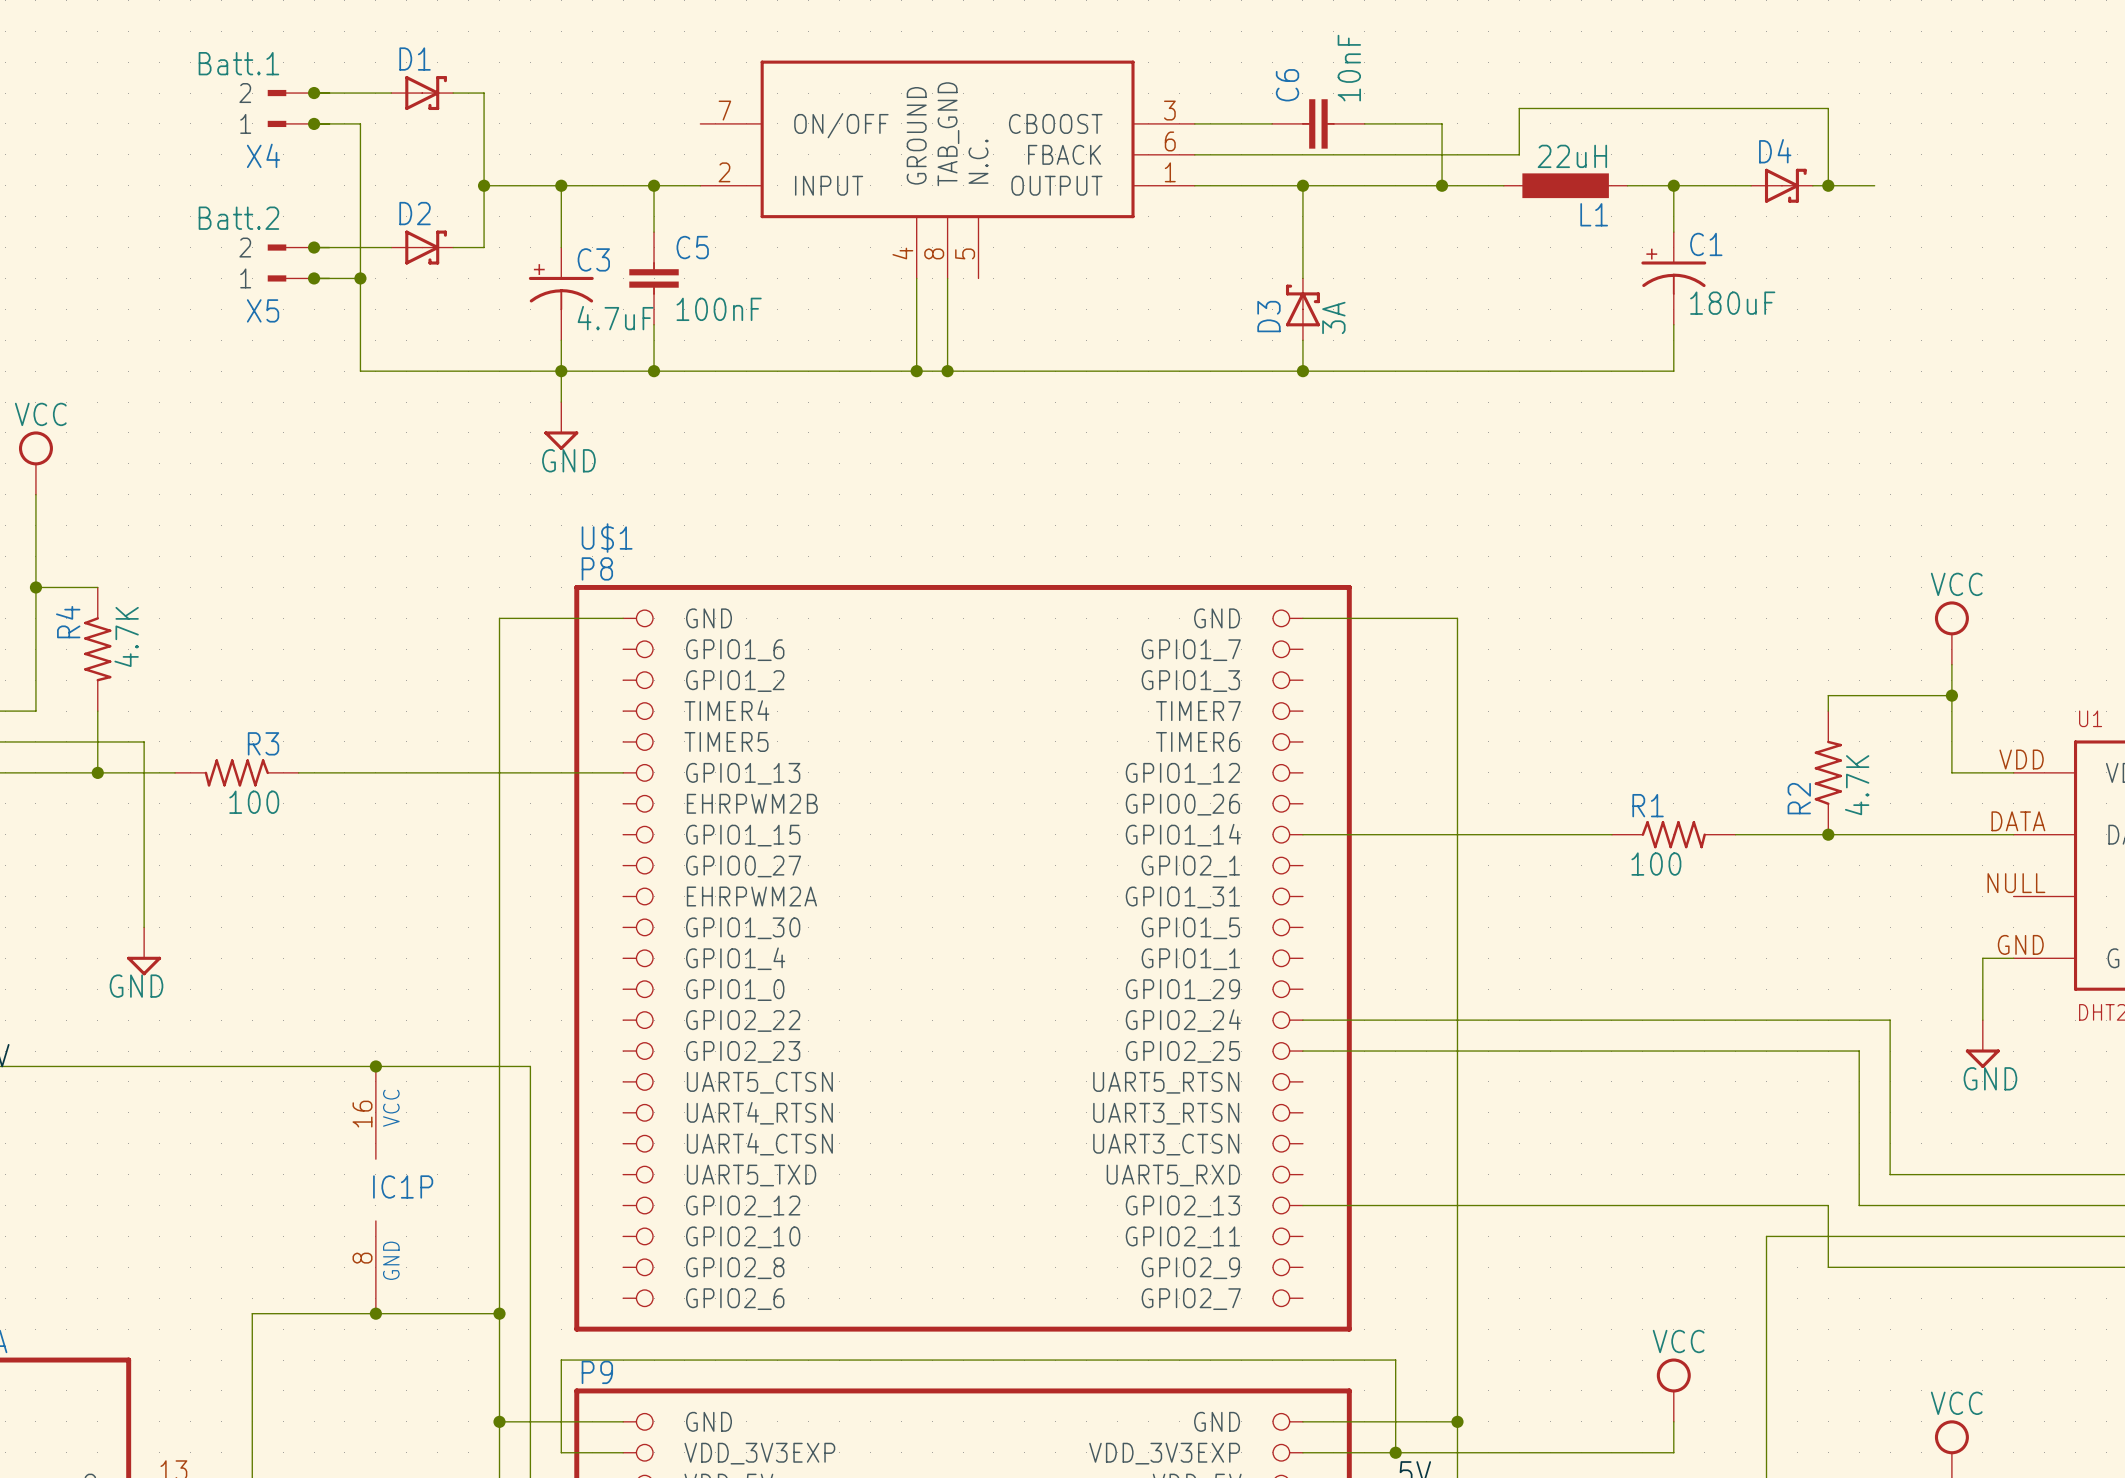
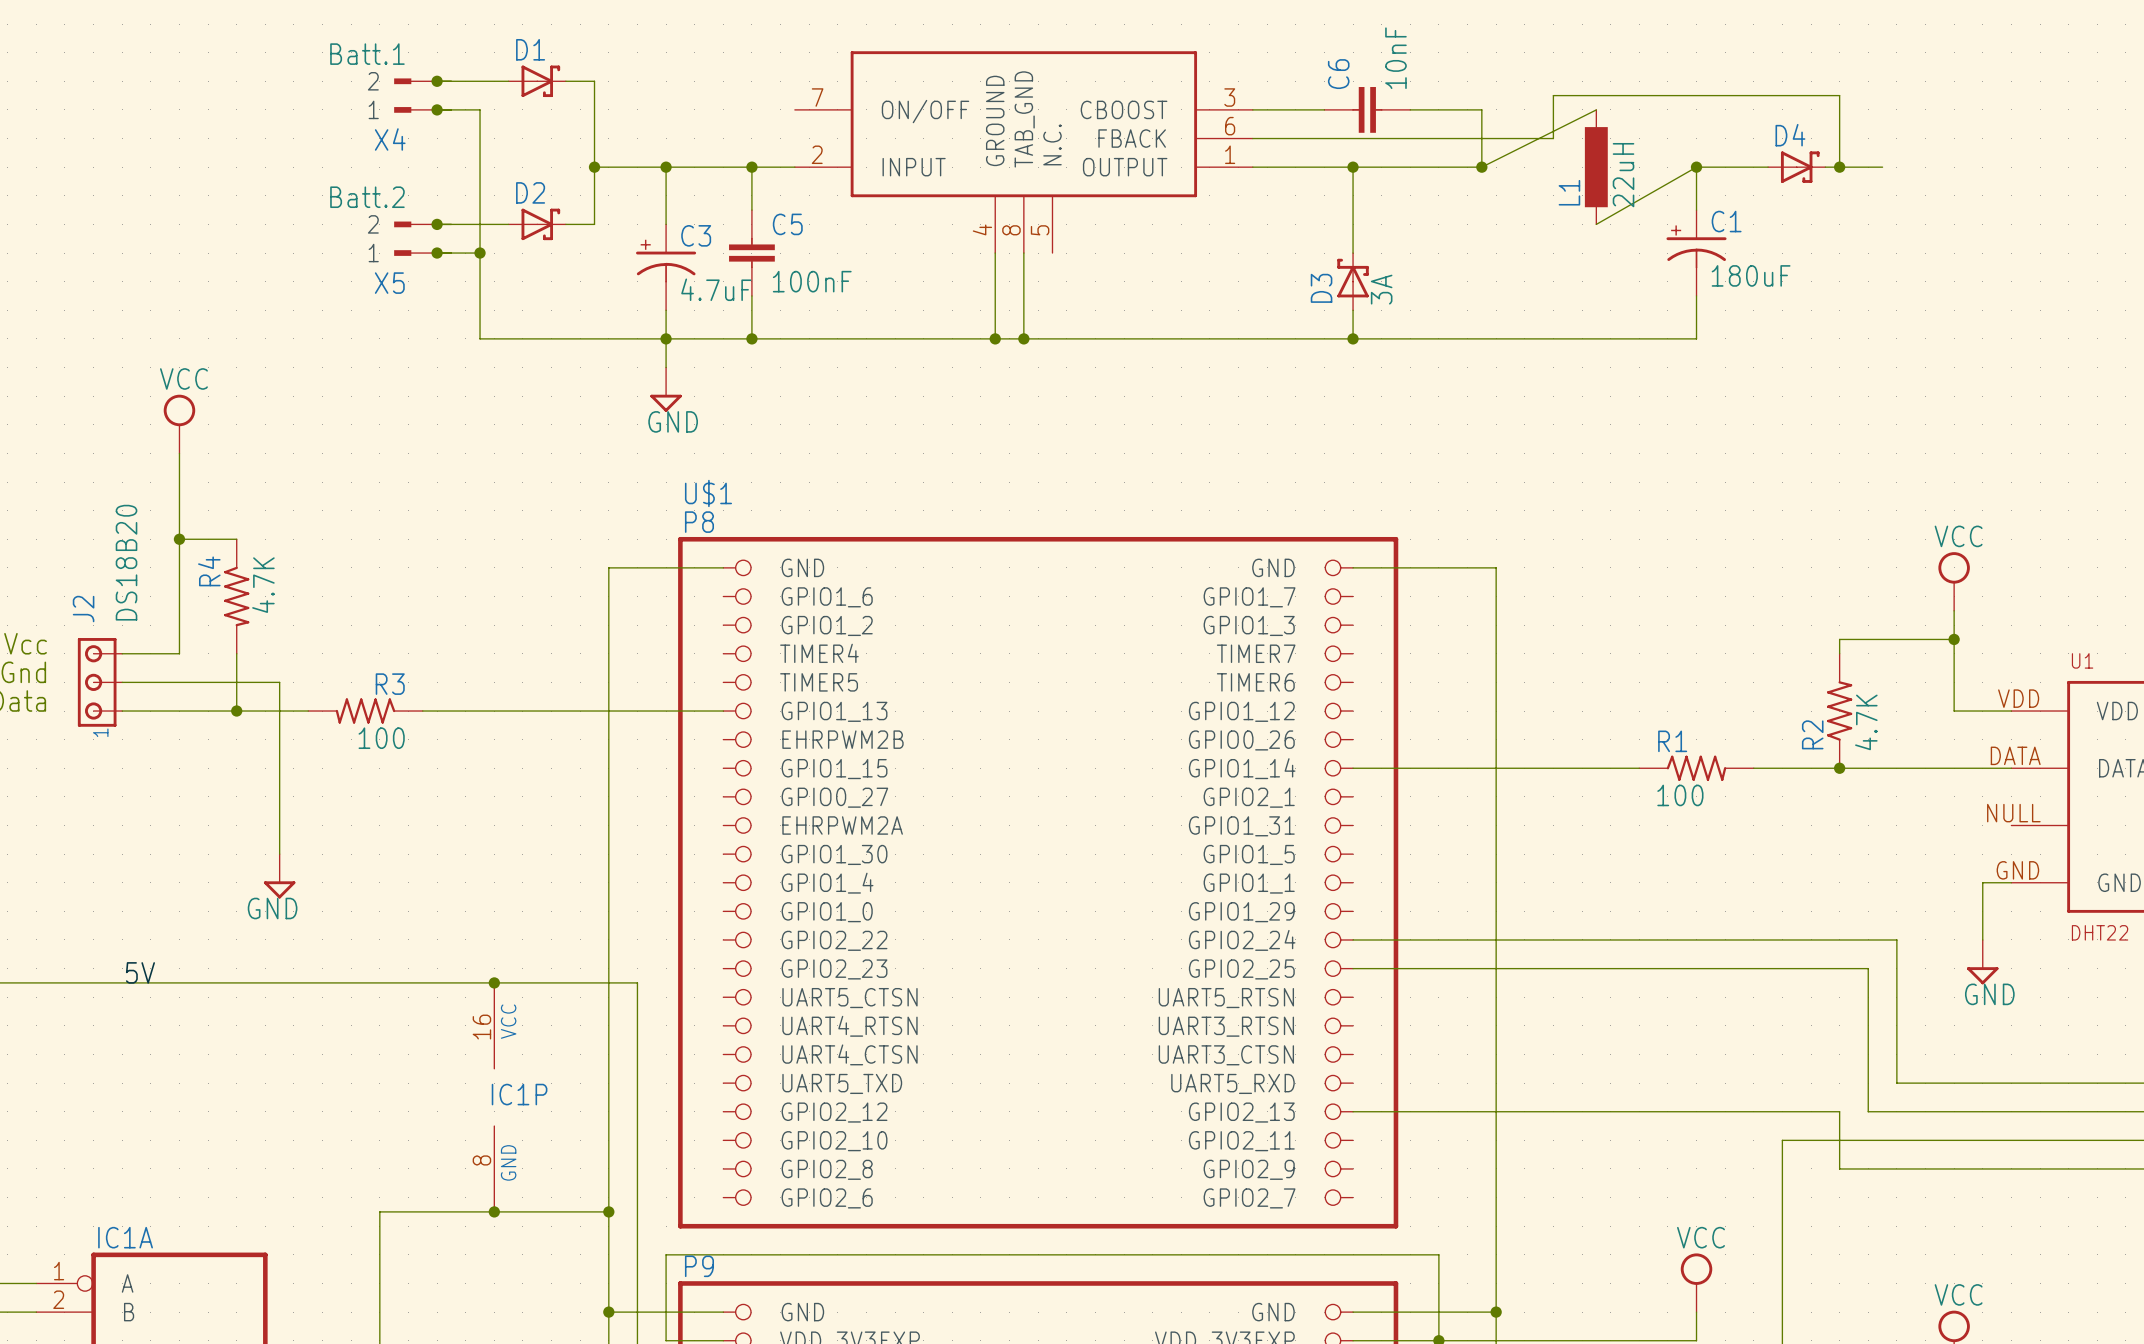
wire: (1442, 185) (1503, 185) -> (1481, 167) (1596, 109)
L1 rotation: 0° (1565, 185) -> 90° clockwise (1596, 167)
wire: (1627, 185) (1673, 185) -> (1596, 224) (1696, 167)

